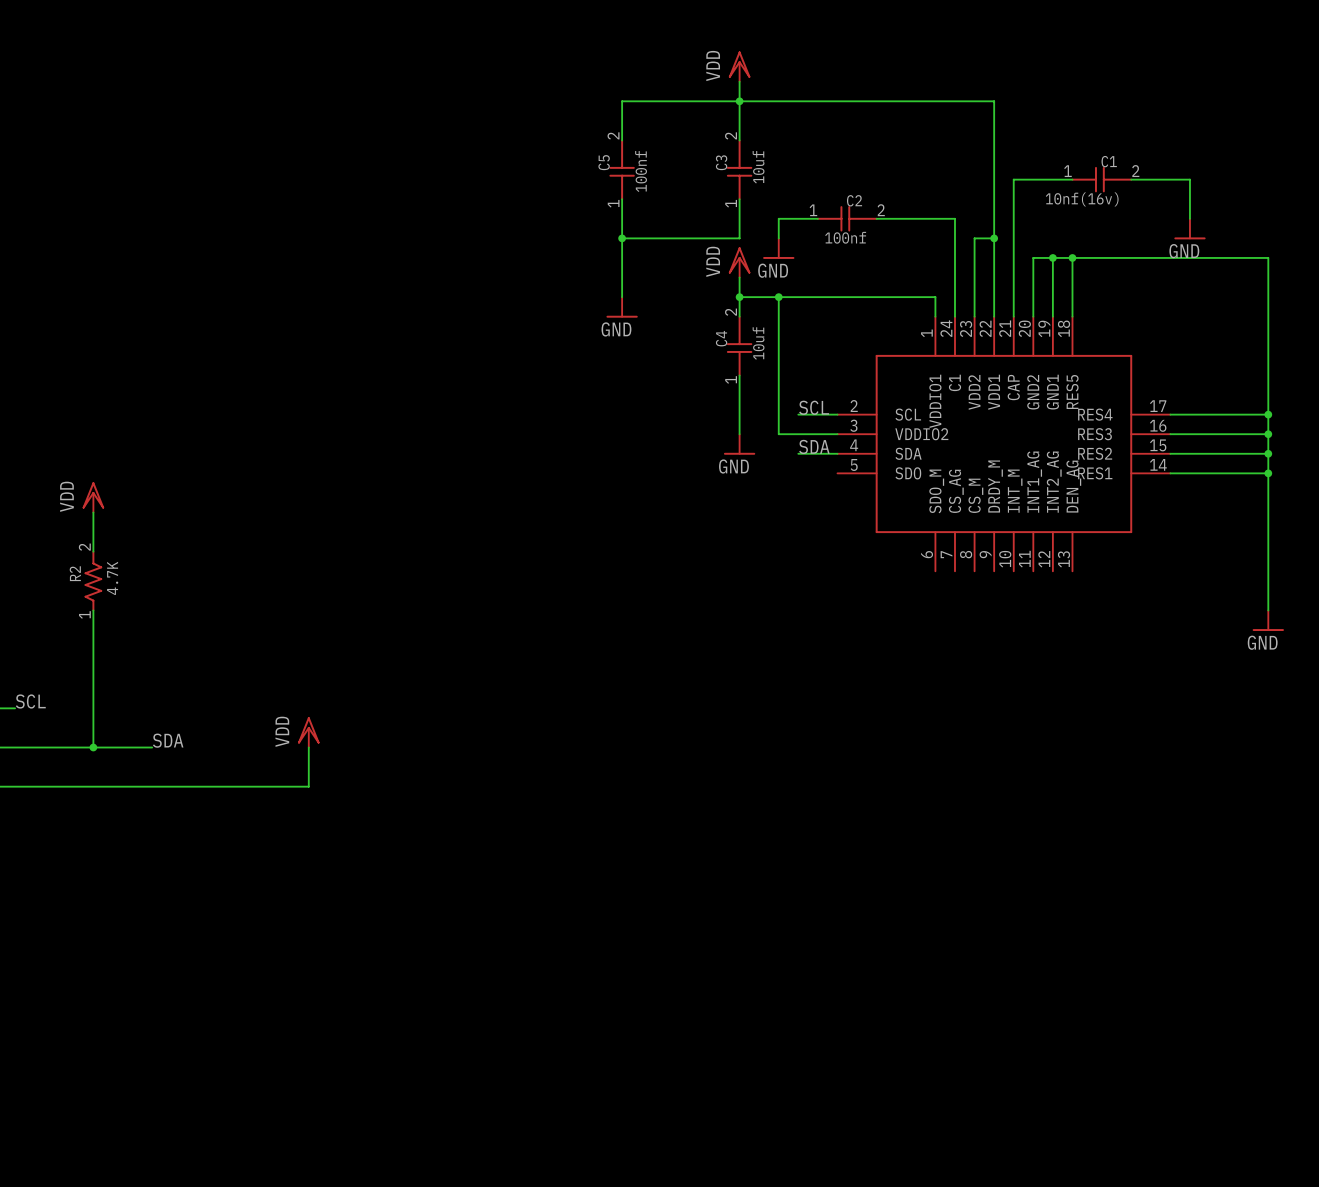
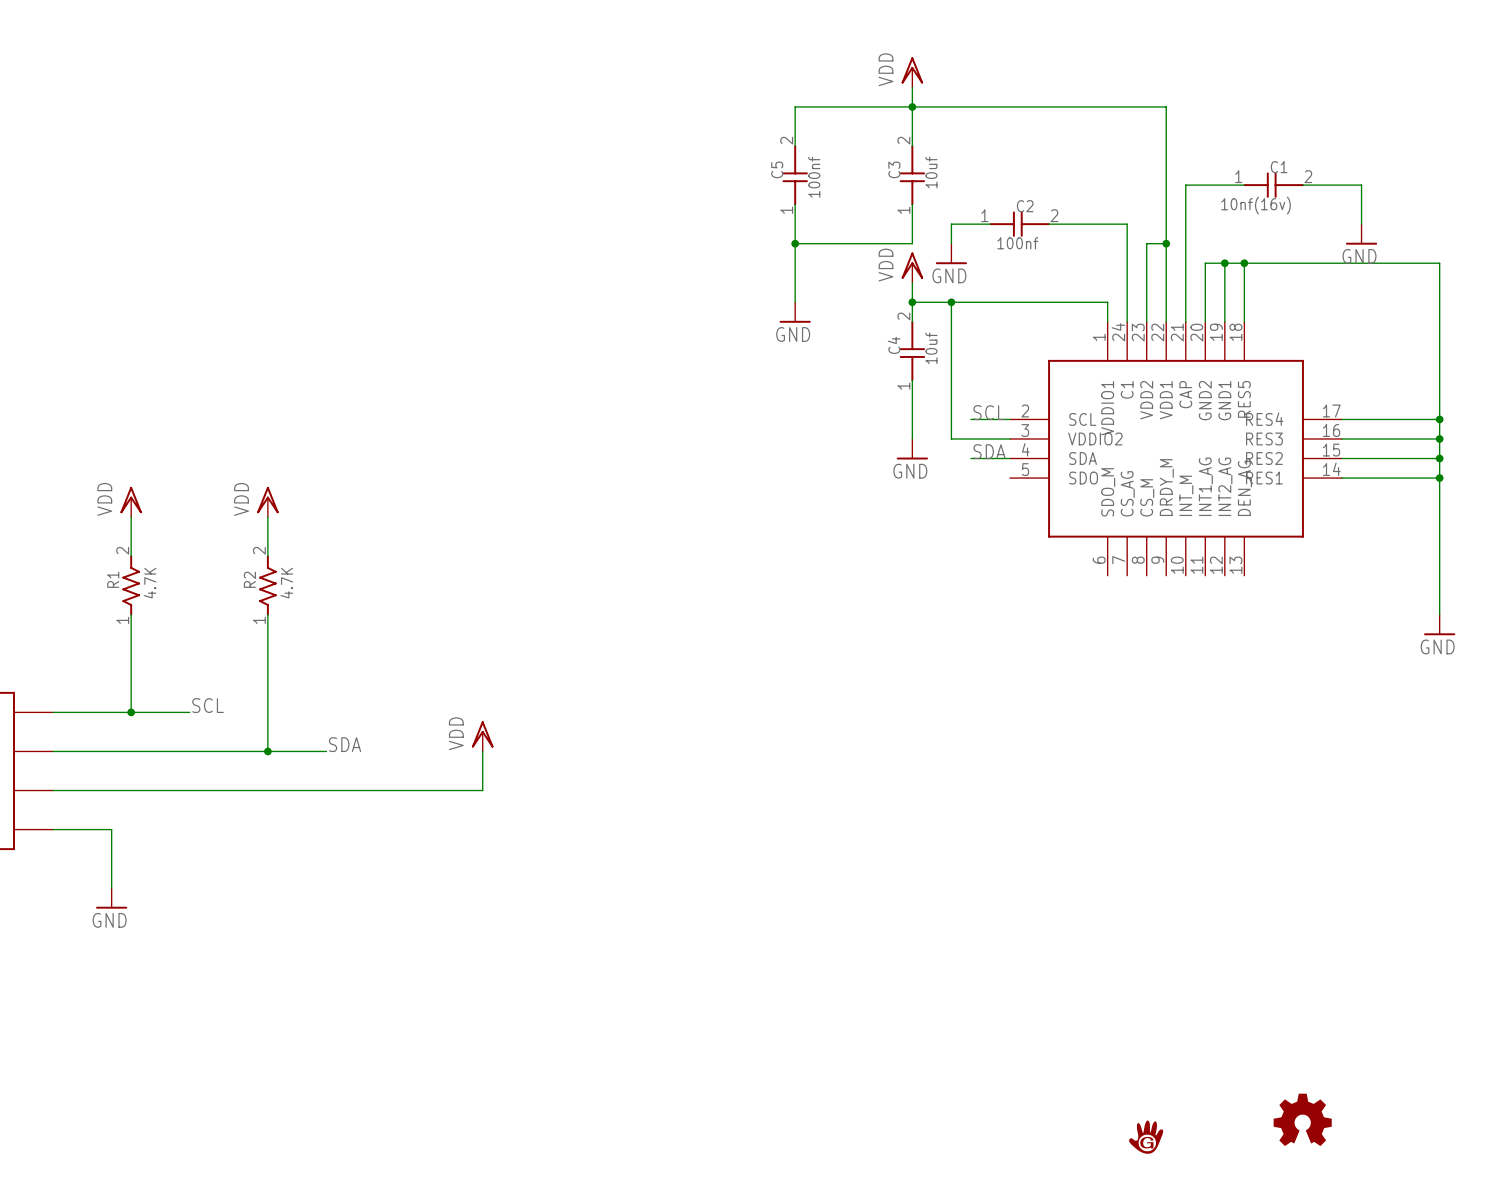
part: none -> (1302, 1119)
part: none -> (1146, 1137)

